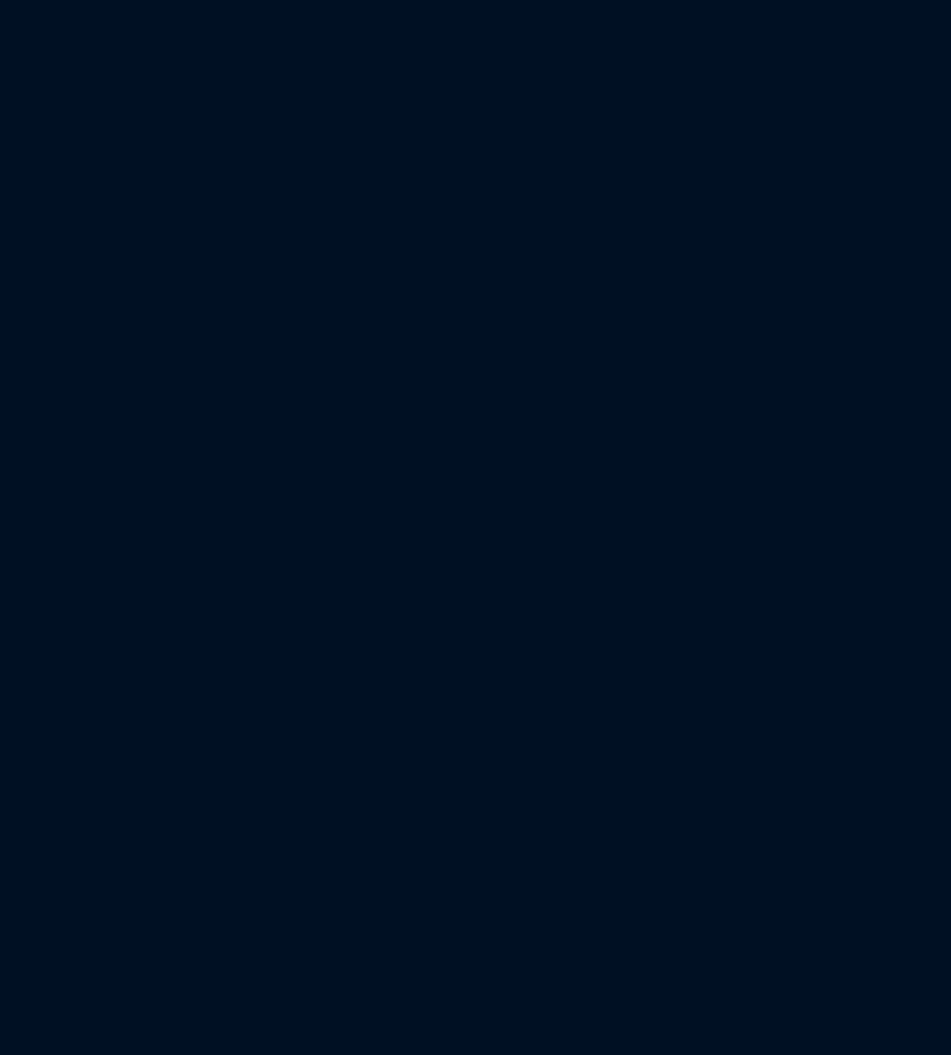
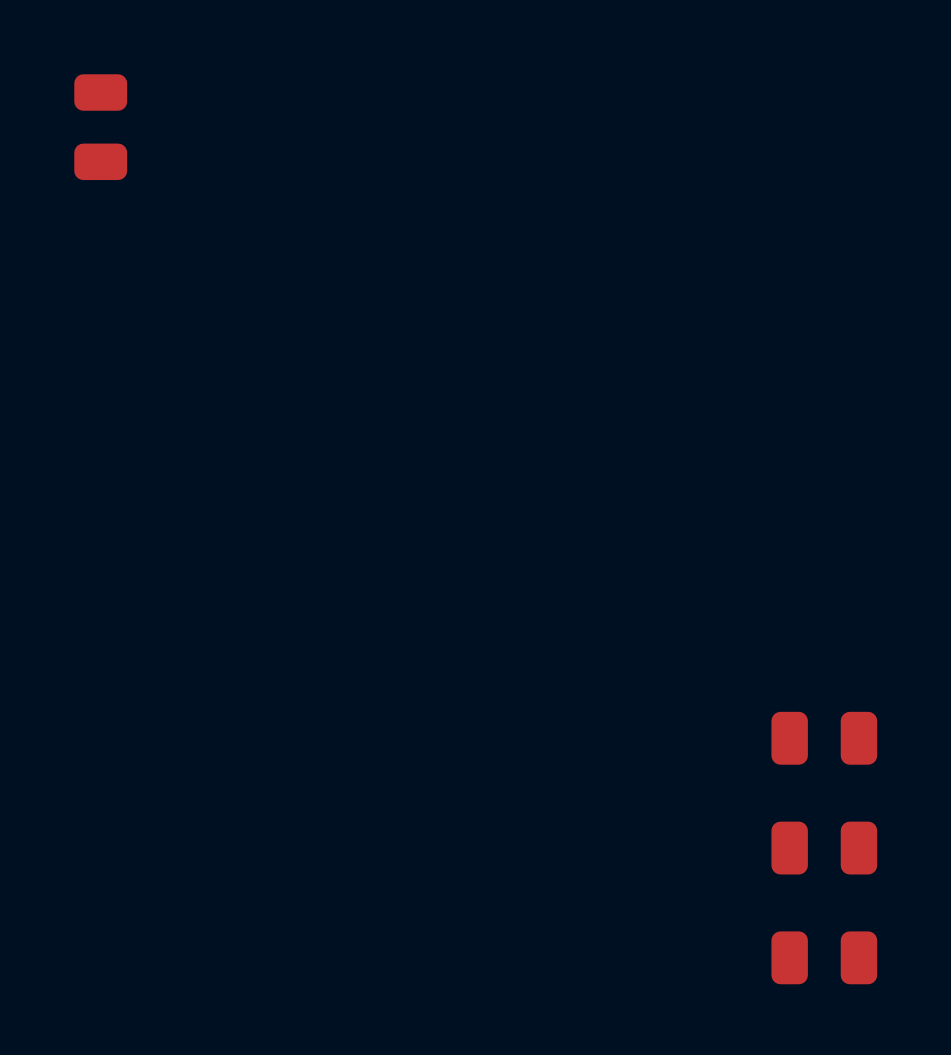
part: none -> (100, 127)
part: none -> (824, 738)
part: none -> (824, 848)
part: none -> (824, 957)

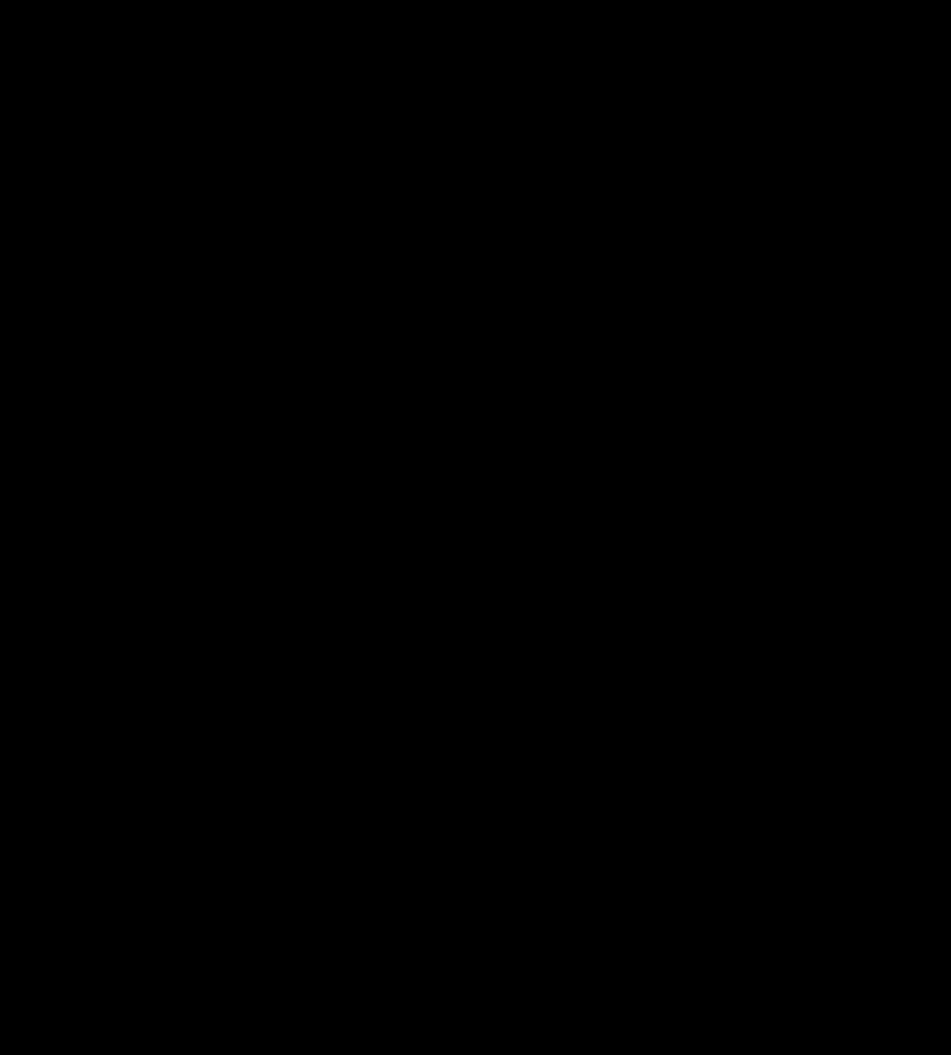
part: (100, 127) -> none
part: (824, 738) -> none
part: (824, 848) -> none
part: (824, 957) -> none

